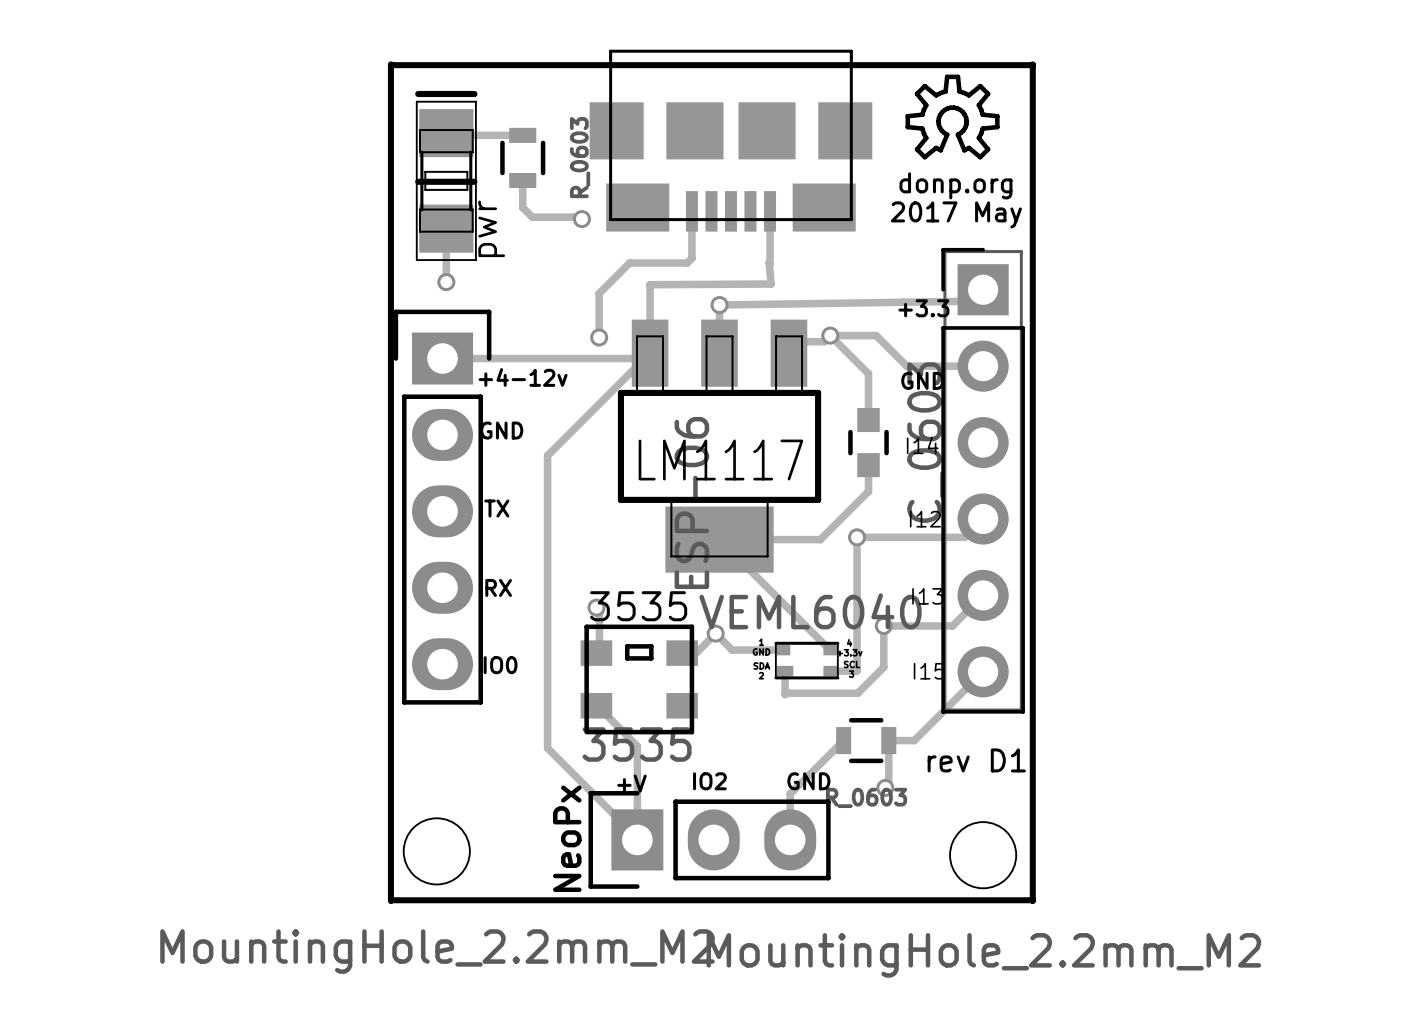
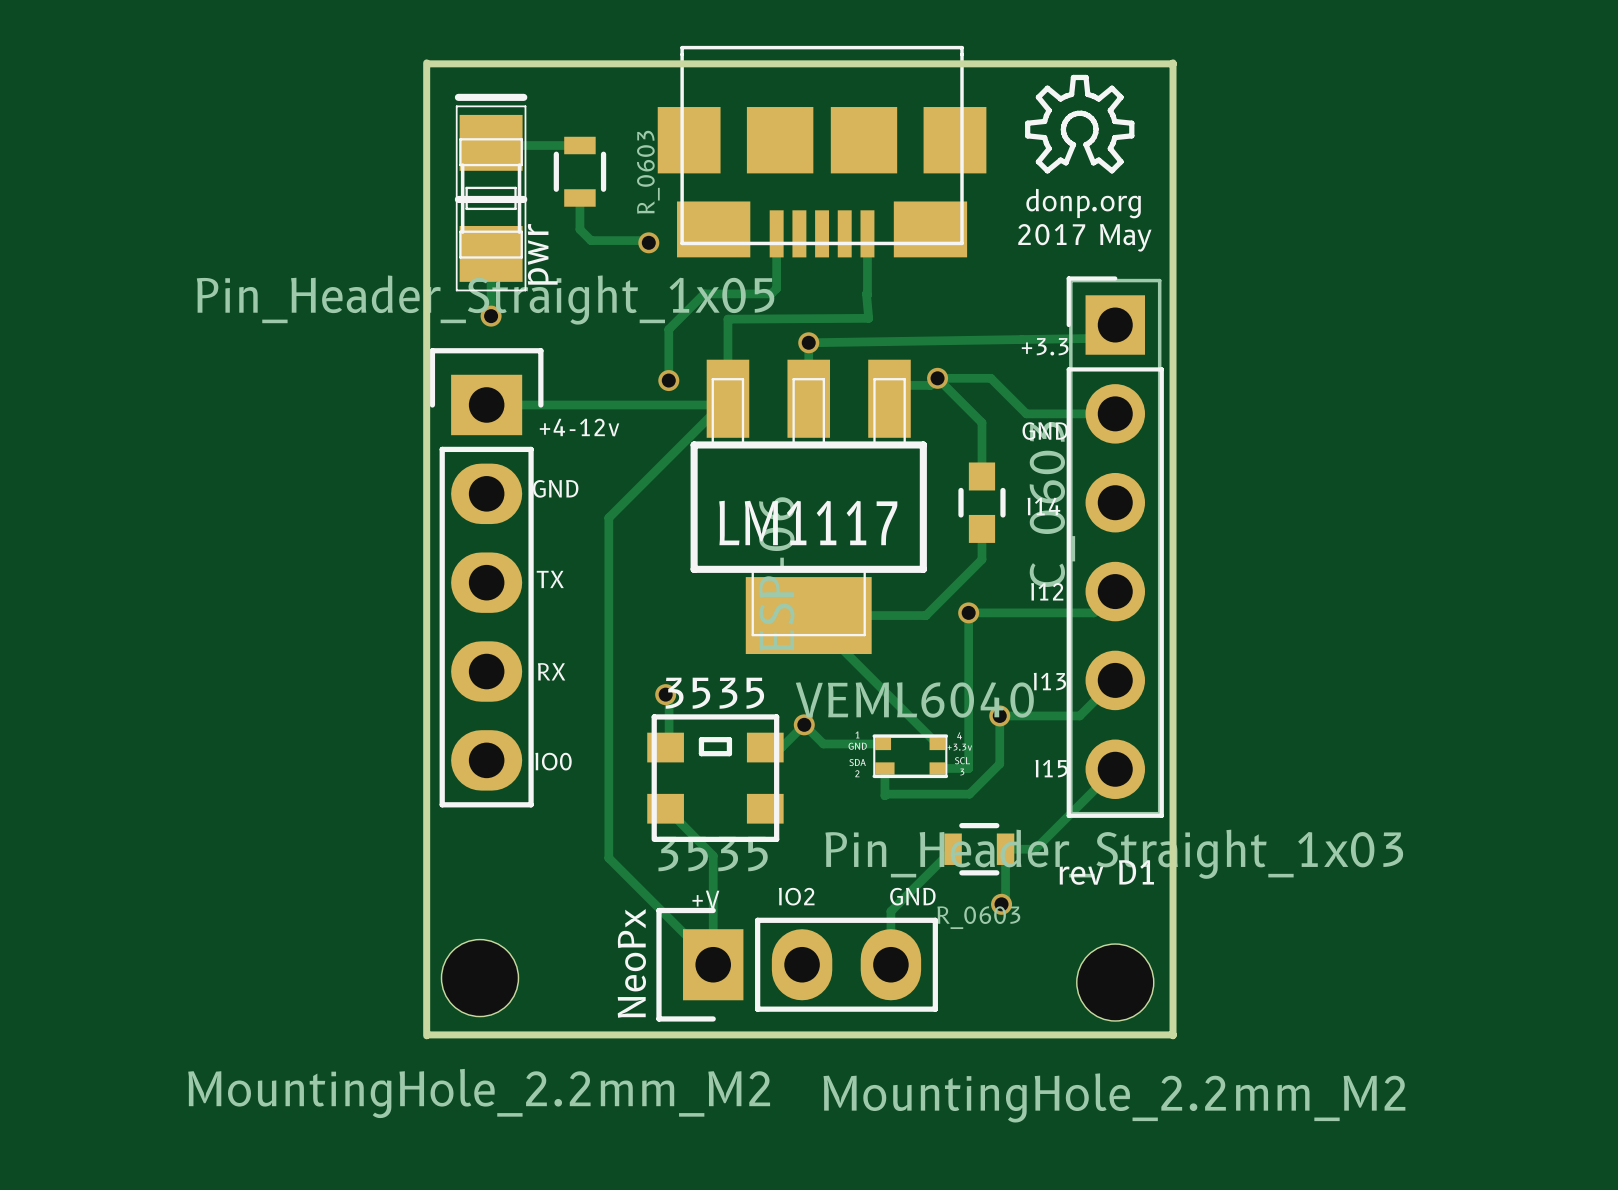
part value: none -> Pin_Header_Straight_1x05 (485, 300)
part value: none -> Pin_Header_Straight_1x03 (1114, 854)

